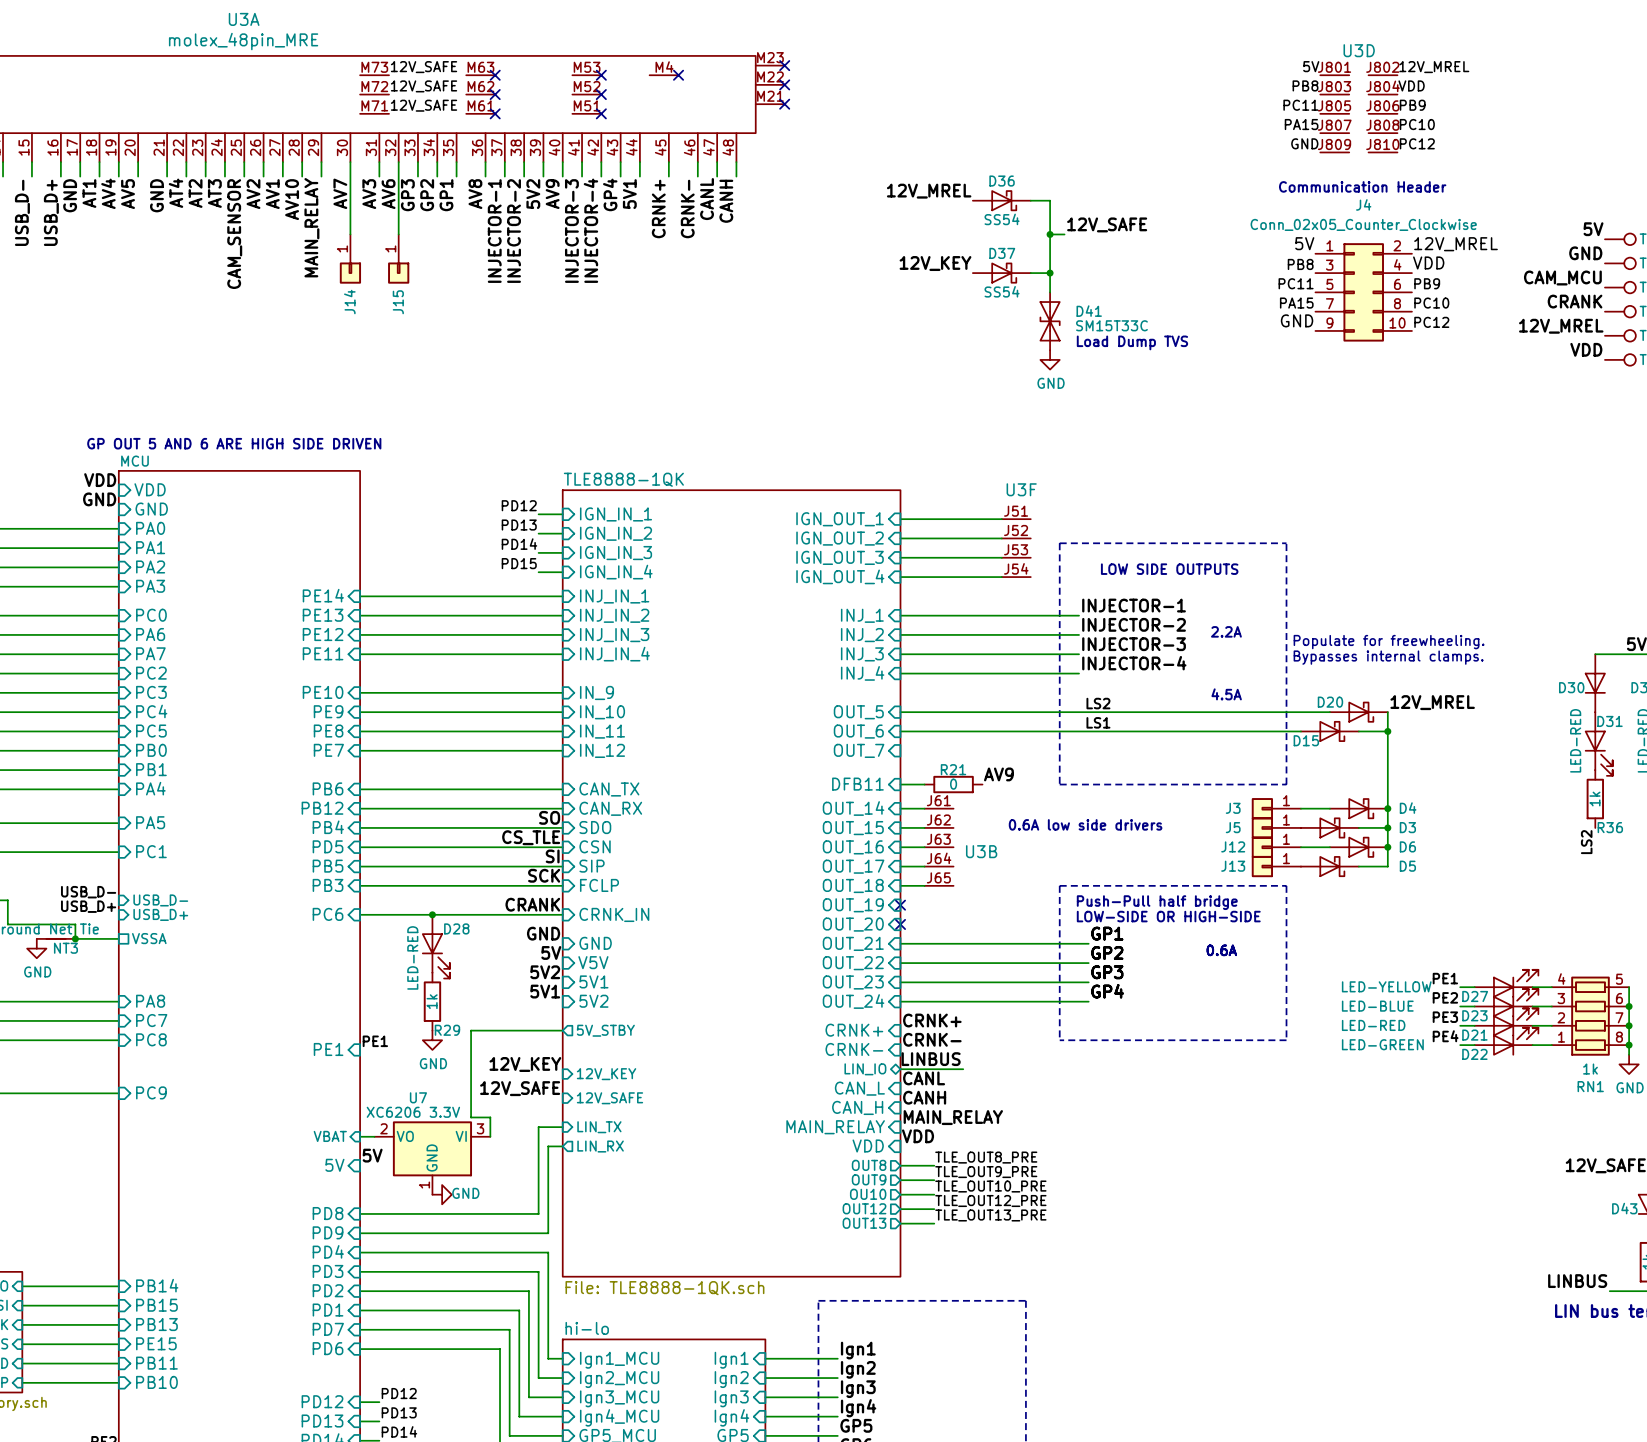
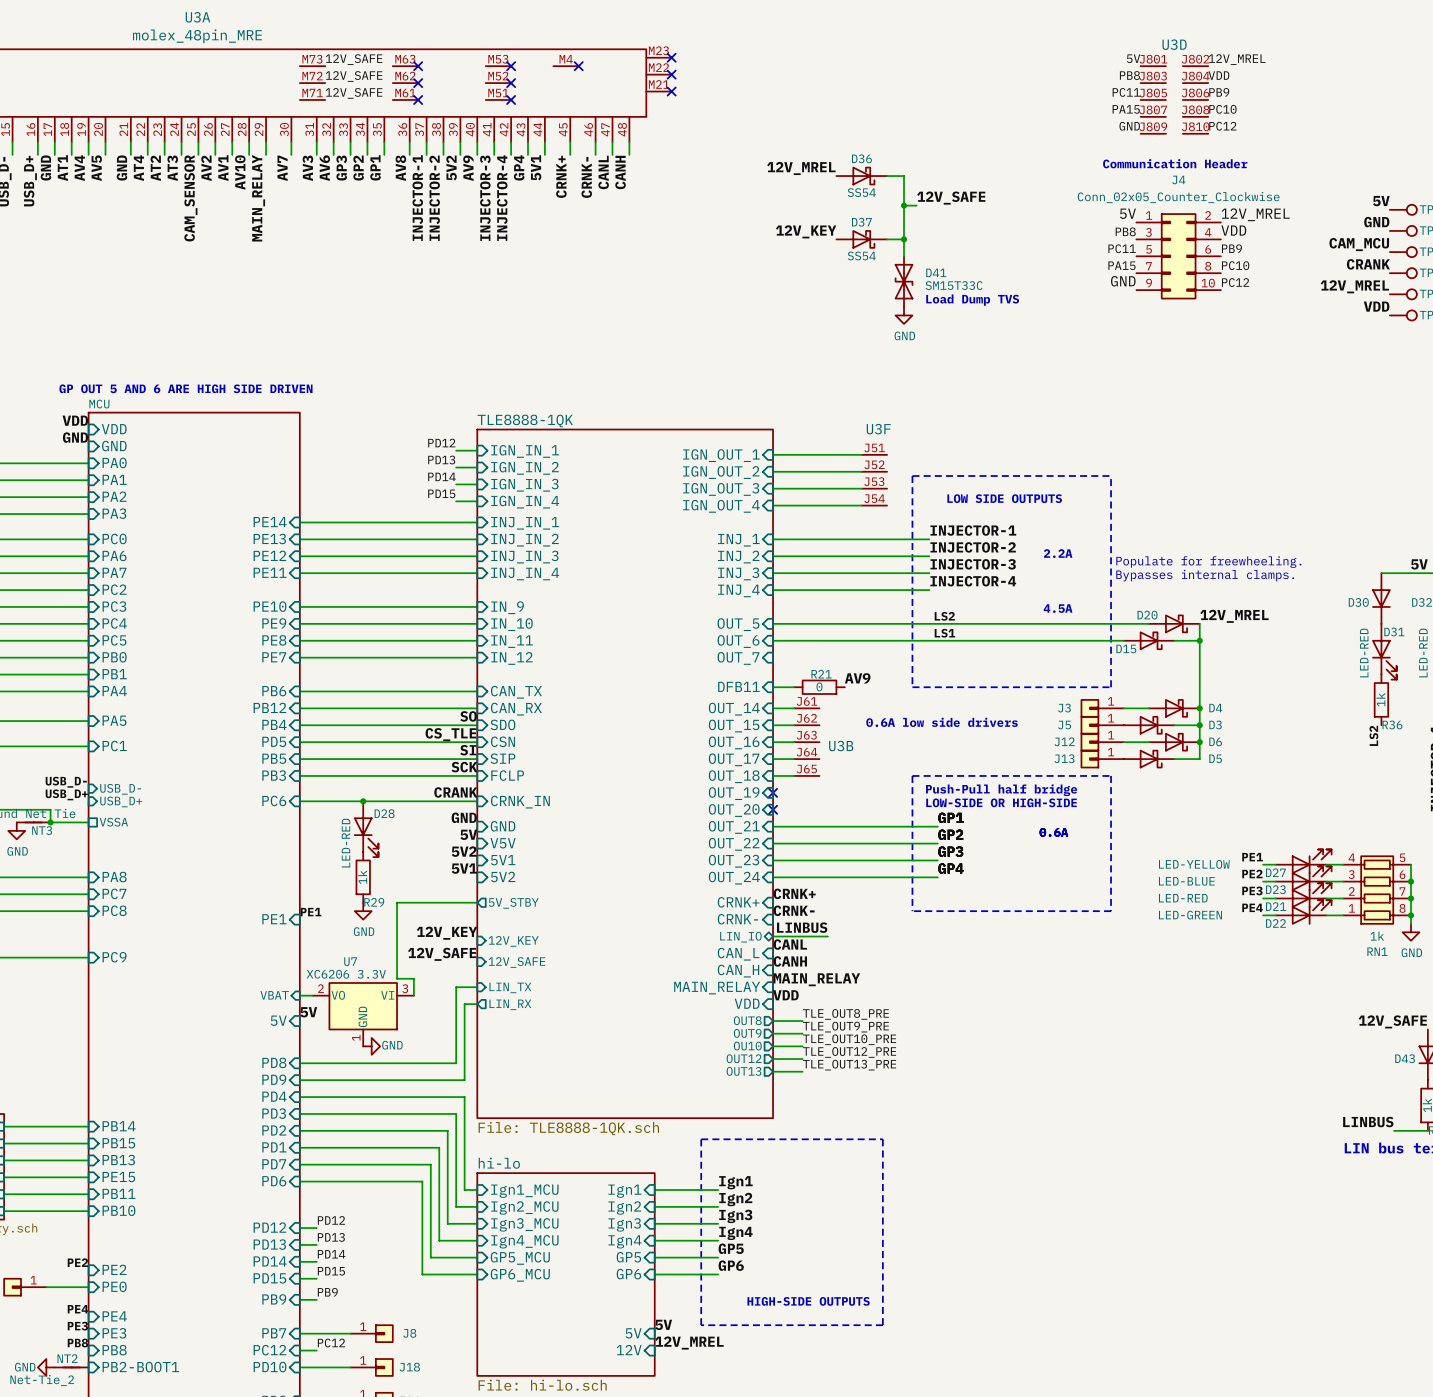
wire: (350, 176) (350, 234) -> none
wire: (398, 176) (398, 234) -> none
J14: (350, 259) -> none
J15: (398, 259) -> none

